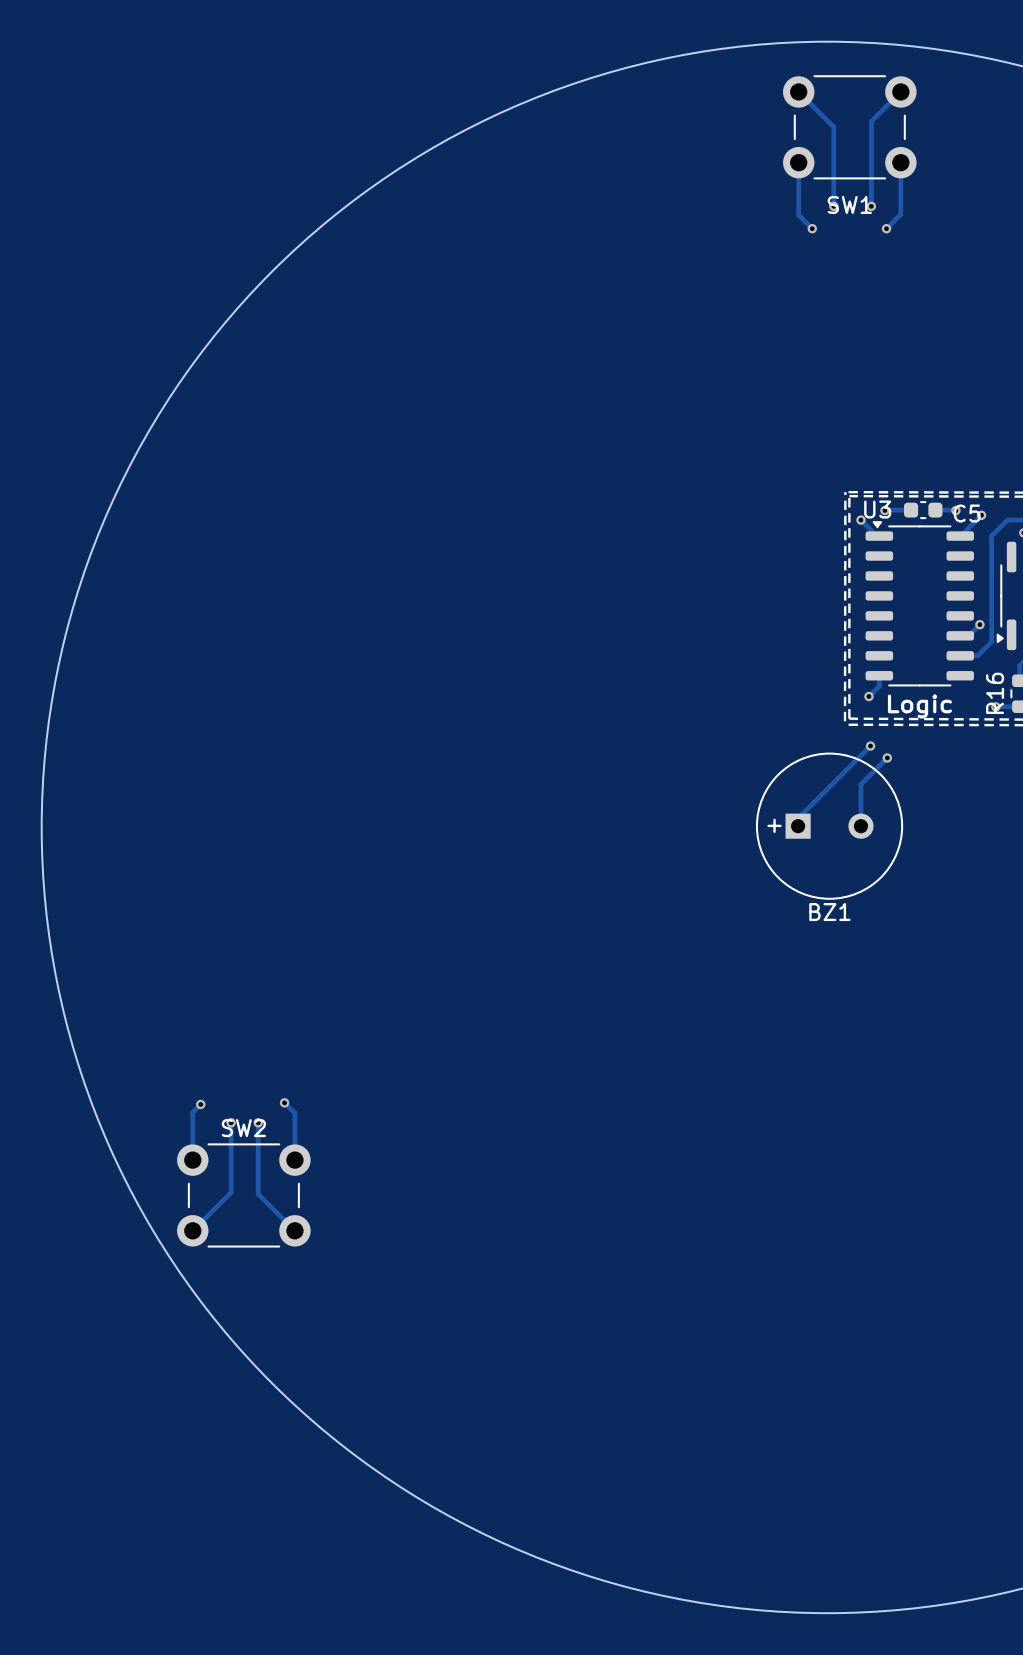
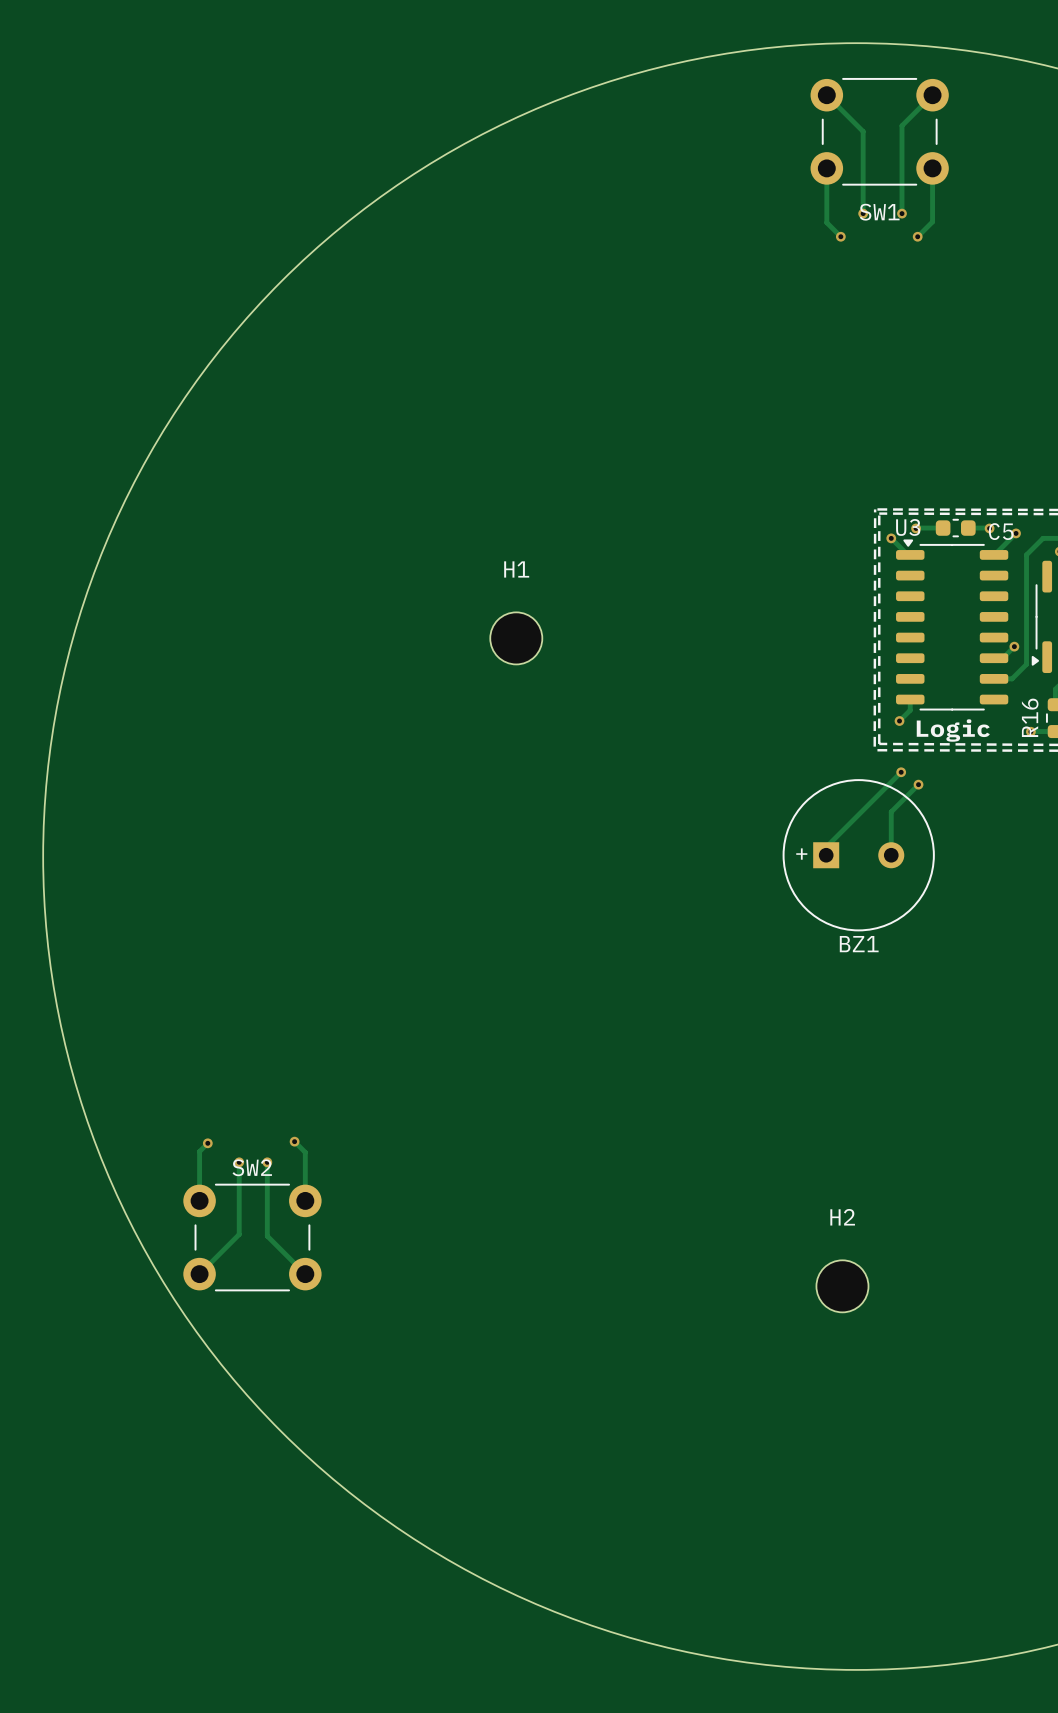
H1: none -> (516, 638)
H2: none -> (842, 1286)

